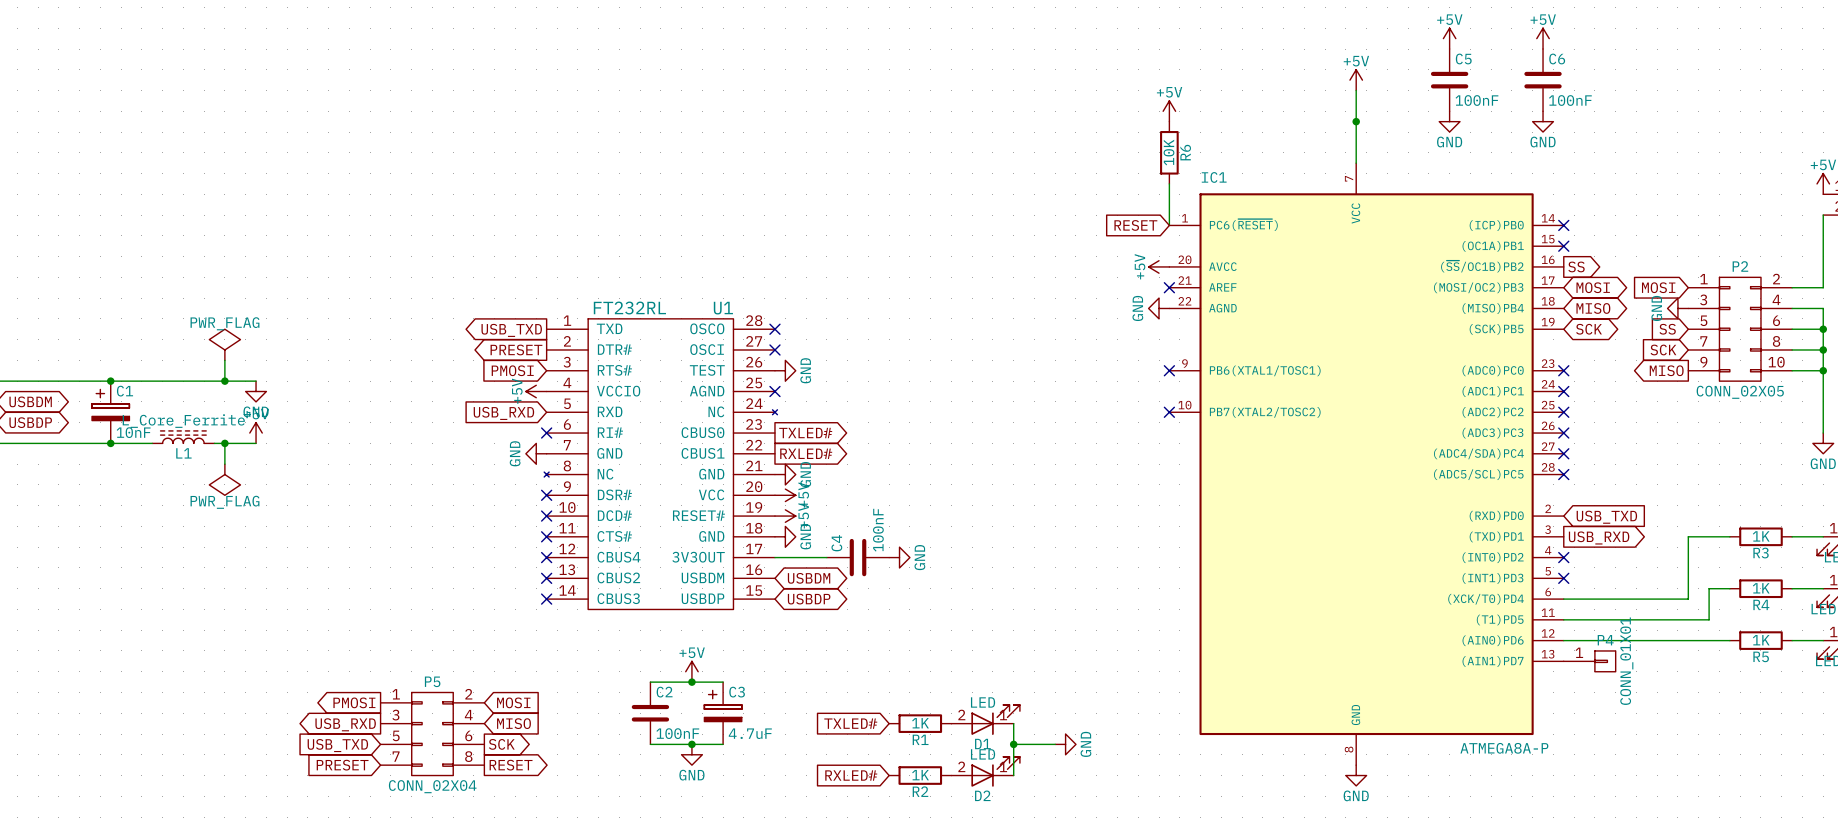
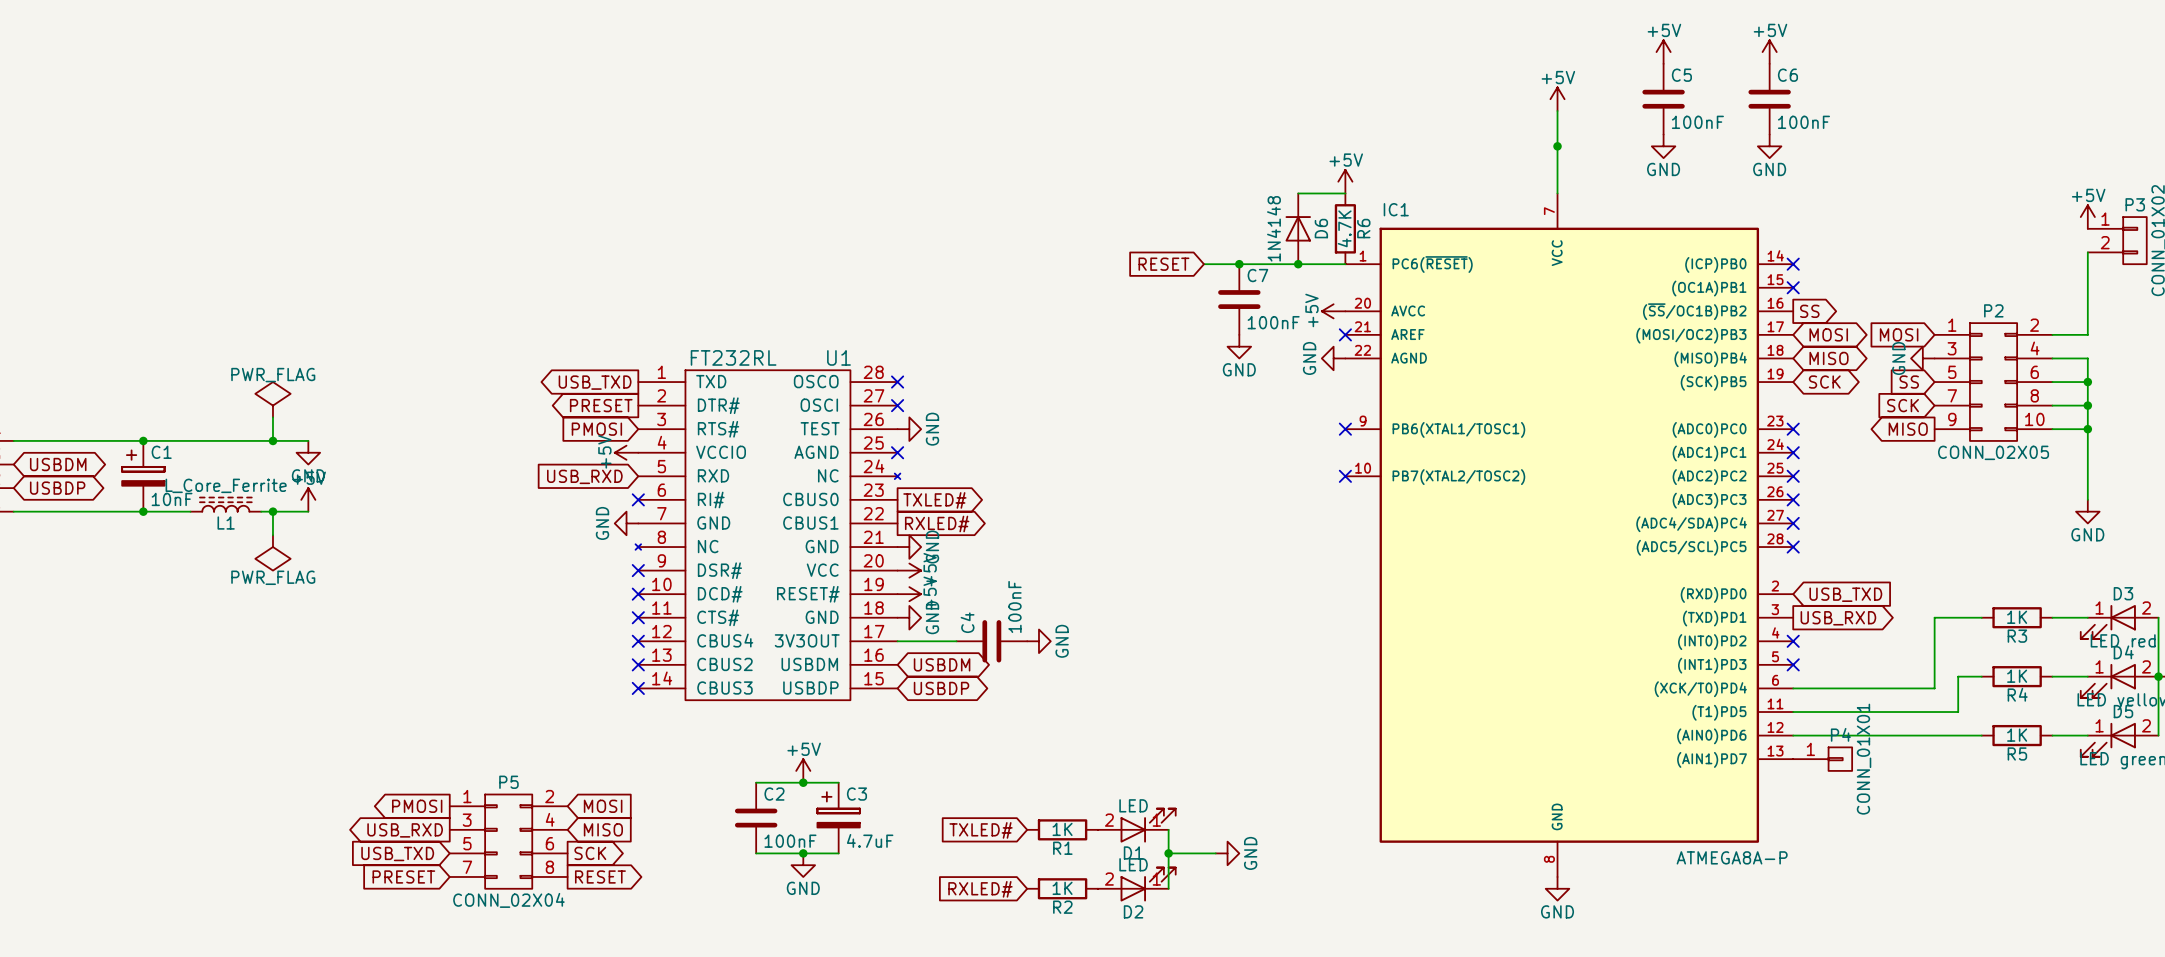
power symbol position: +5V (1169, 111) -> +5V (1345, 181)
R6 value: 10K (1168, 152) -> 4.7K (1344, 228)
R6 position: (1169, 152) -> (1345, 228)
wire: none -> (1298, 193) (1345, 193)
wire: (1169, 183) (1169, 225) -> (1203, 264) (1345, 264)
D6: none -> 1N4148 (1298, 228)
junction: none -> (1239, 264)
junction: none -> (1298, 264)
global label position: RESET (1135, 225) -> RESET (1163, 264)
C7: none -> 100nF (1239, 299)
power symbol: none -> GND (1239, 346)

